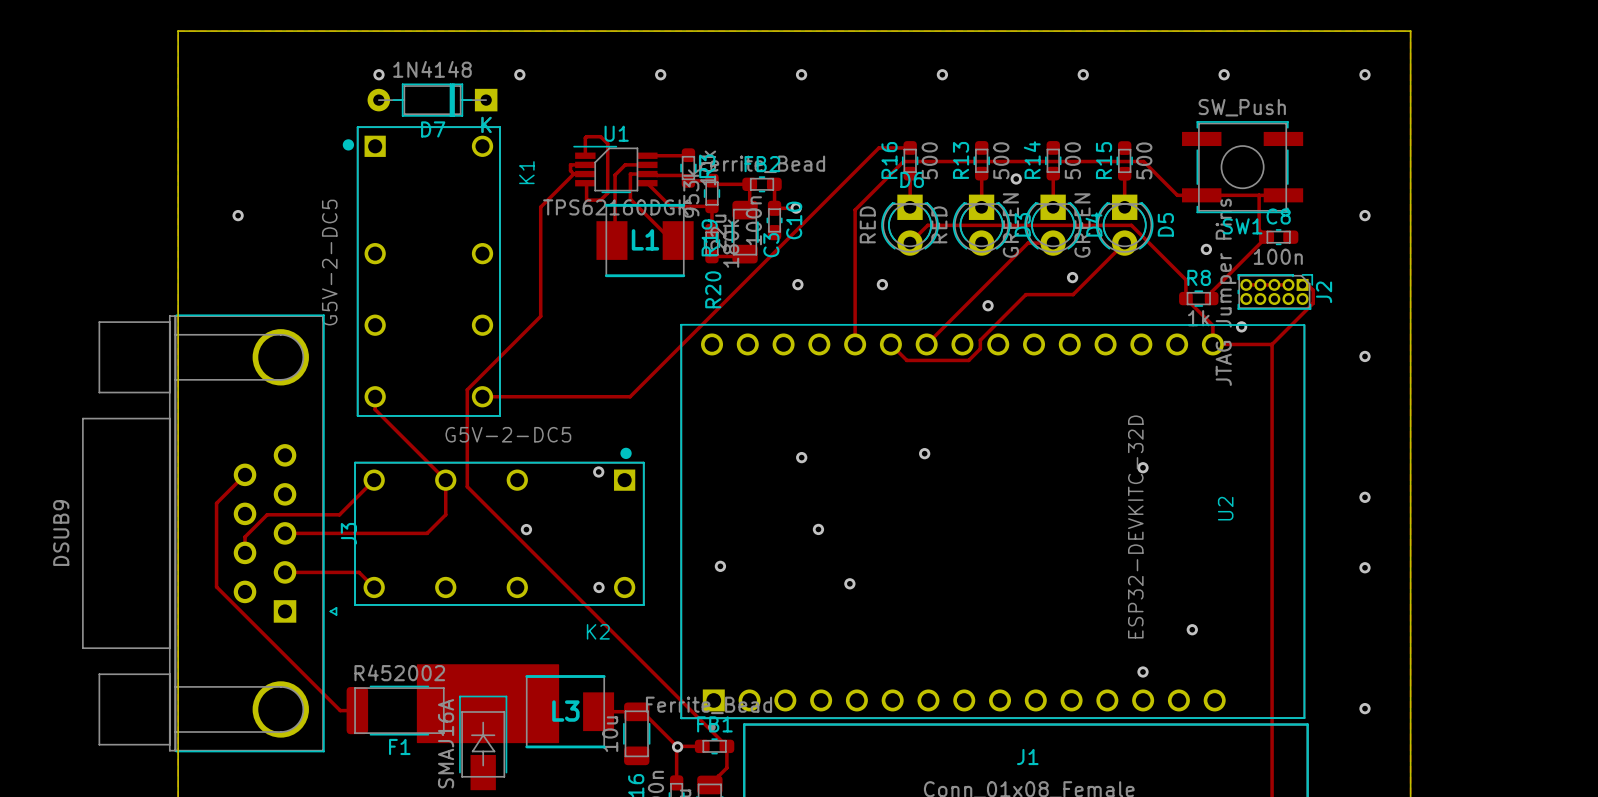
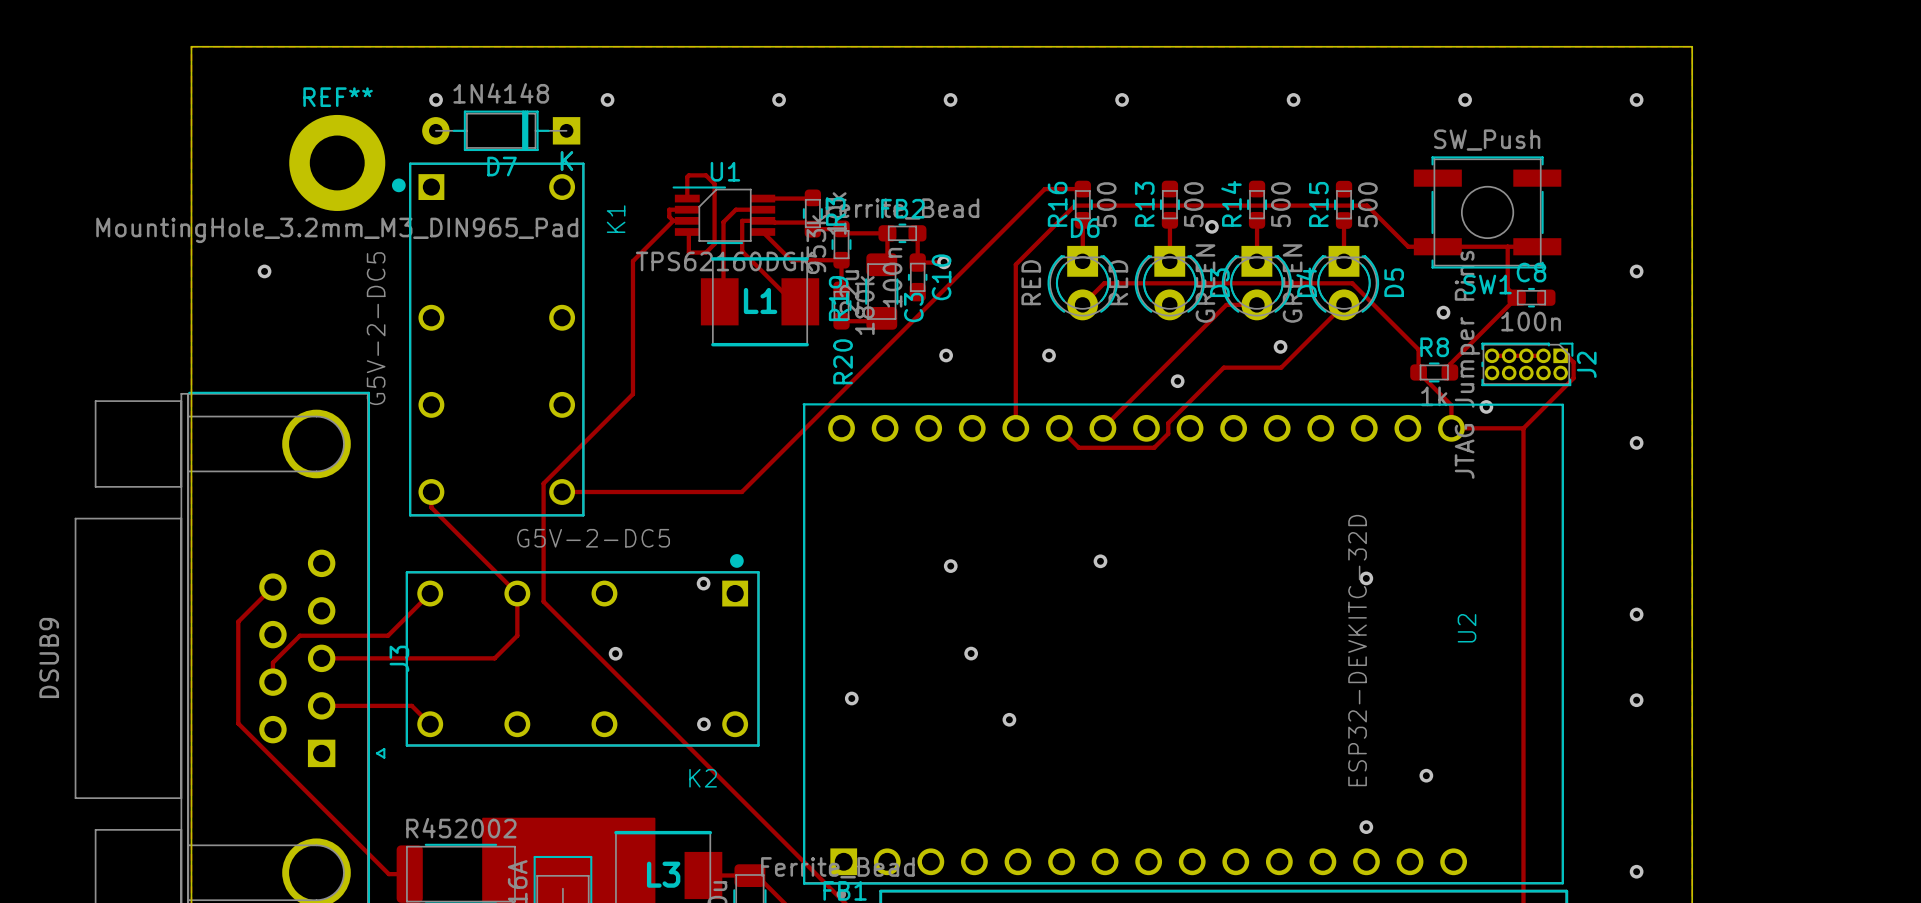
REF**: none -> MountingHole_3.2mm_M3_DIN965_Pad (337, 162)

